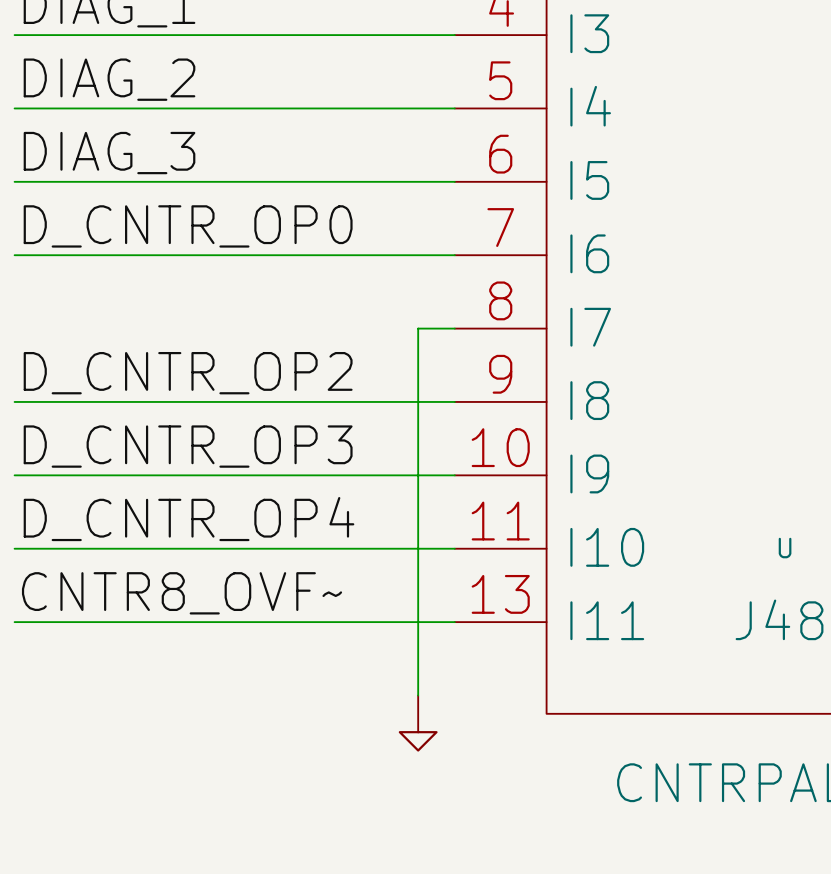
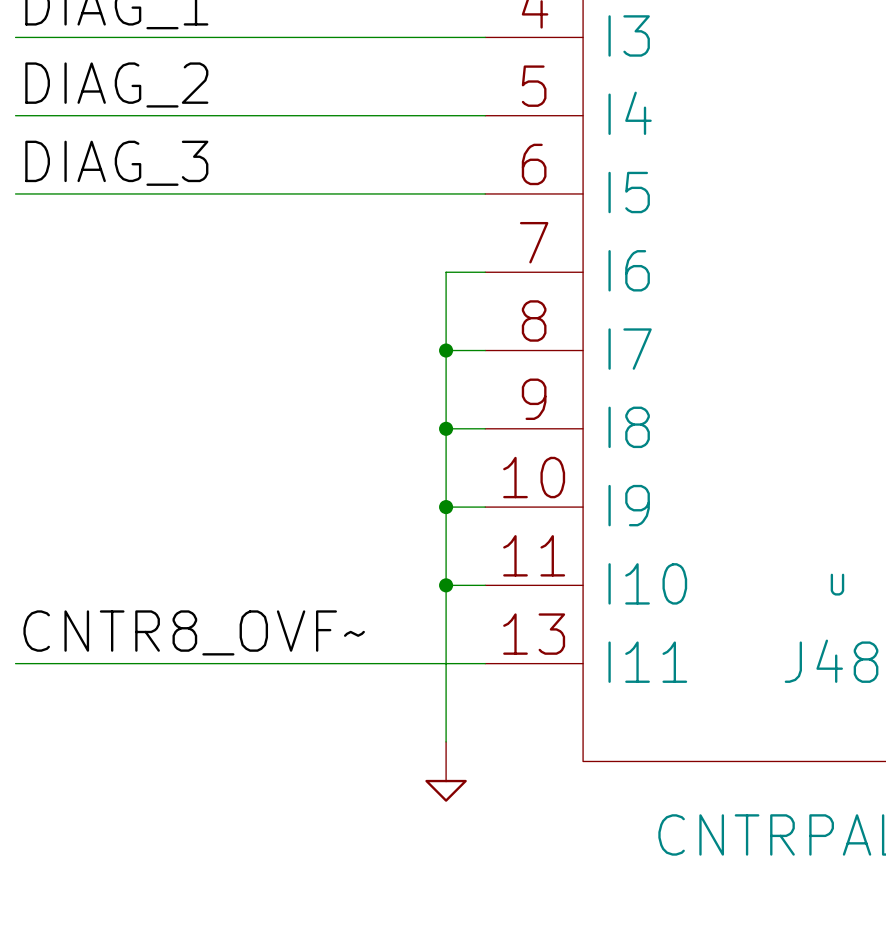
label: D_CNTR_OP0 (188, 226) -> none
wire: (14, 255) (418, 255) -> (446, 350) (446, 272)
junction: none -> (446, 350)
label: D_CNTR_OP2 (188, 373) -> none
wire: (14, 401) (418, 401) -> none
junction: none -> (446, 428)
label: D_CNTR_OP3 (188, 446) -> none
wire: (14, 475) (418, 475) -> none
junction: none -> (446, 507)
label: D_CNTR_OP4 (189, 519) -> none
wire: (14, 548) (418, 548) -> none
junction: none -> (446, 585)

